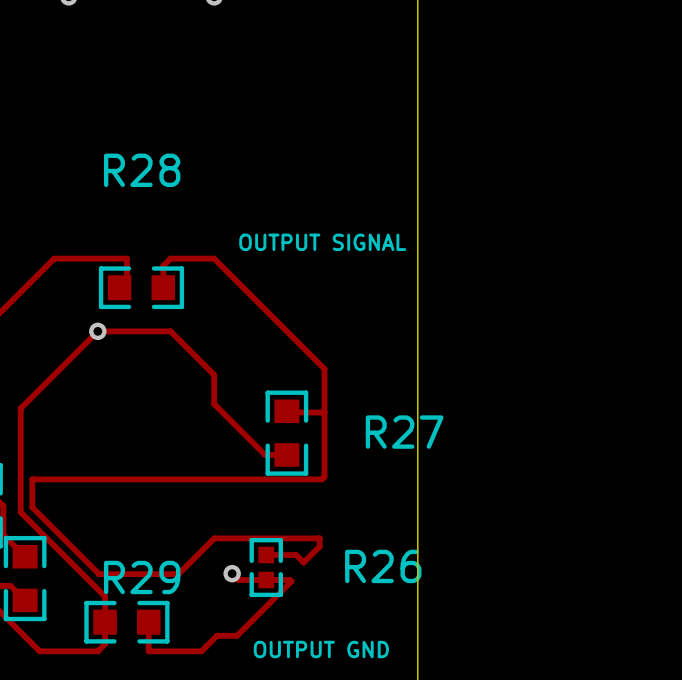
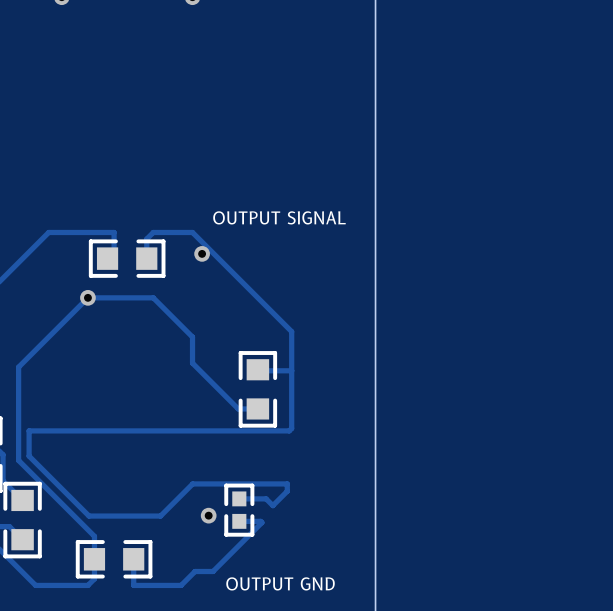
R28 name: R28 (142, 170) -> none
via: none -> (202, 253)
R27 name: R27 (404, 432) -> none
R26 name: R26 (383, 566) -> none
track: (232, 573) (238, 580) (266, 580) -> none
R29 name: R29 (142, 577) -> none

